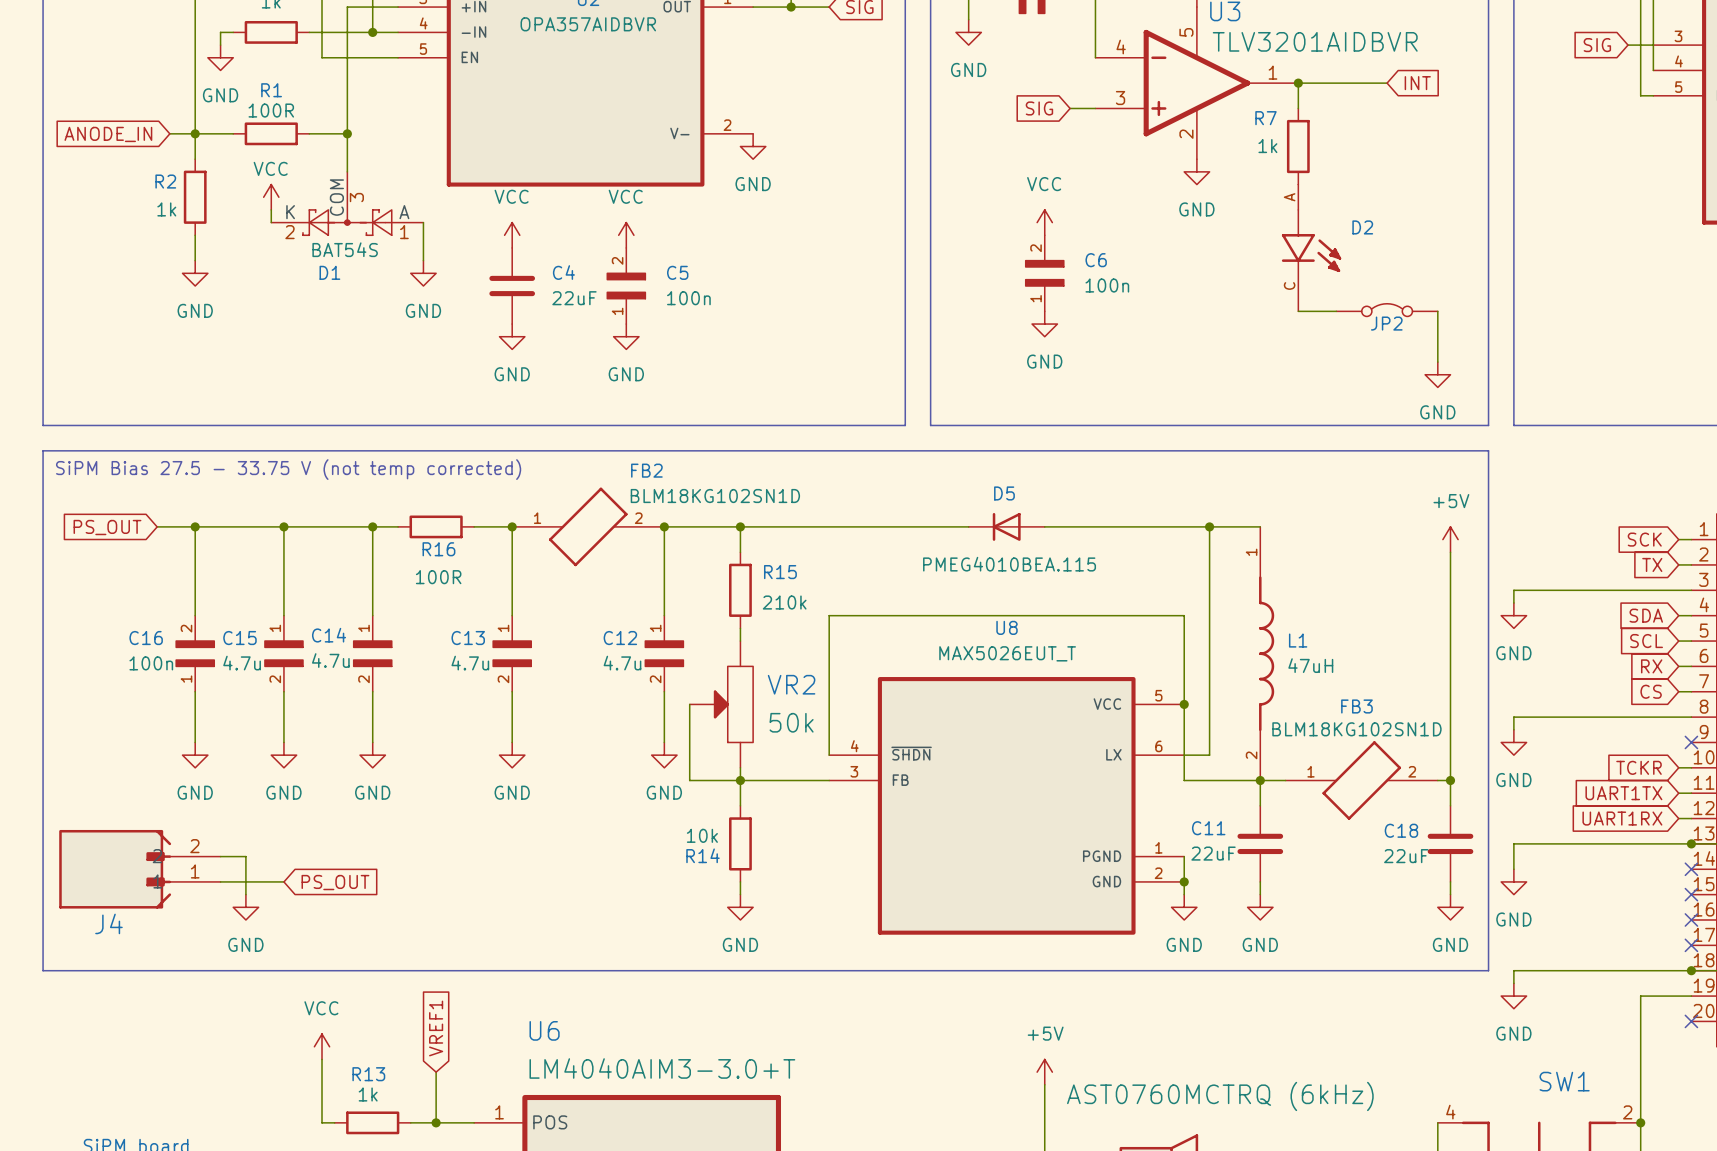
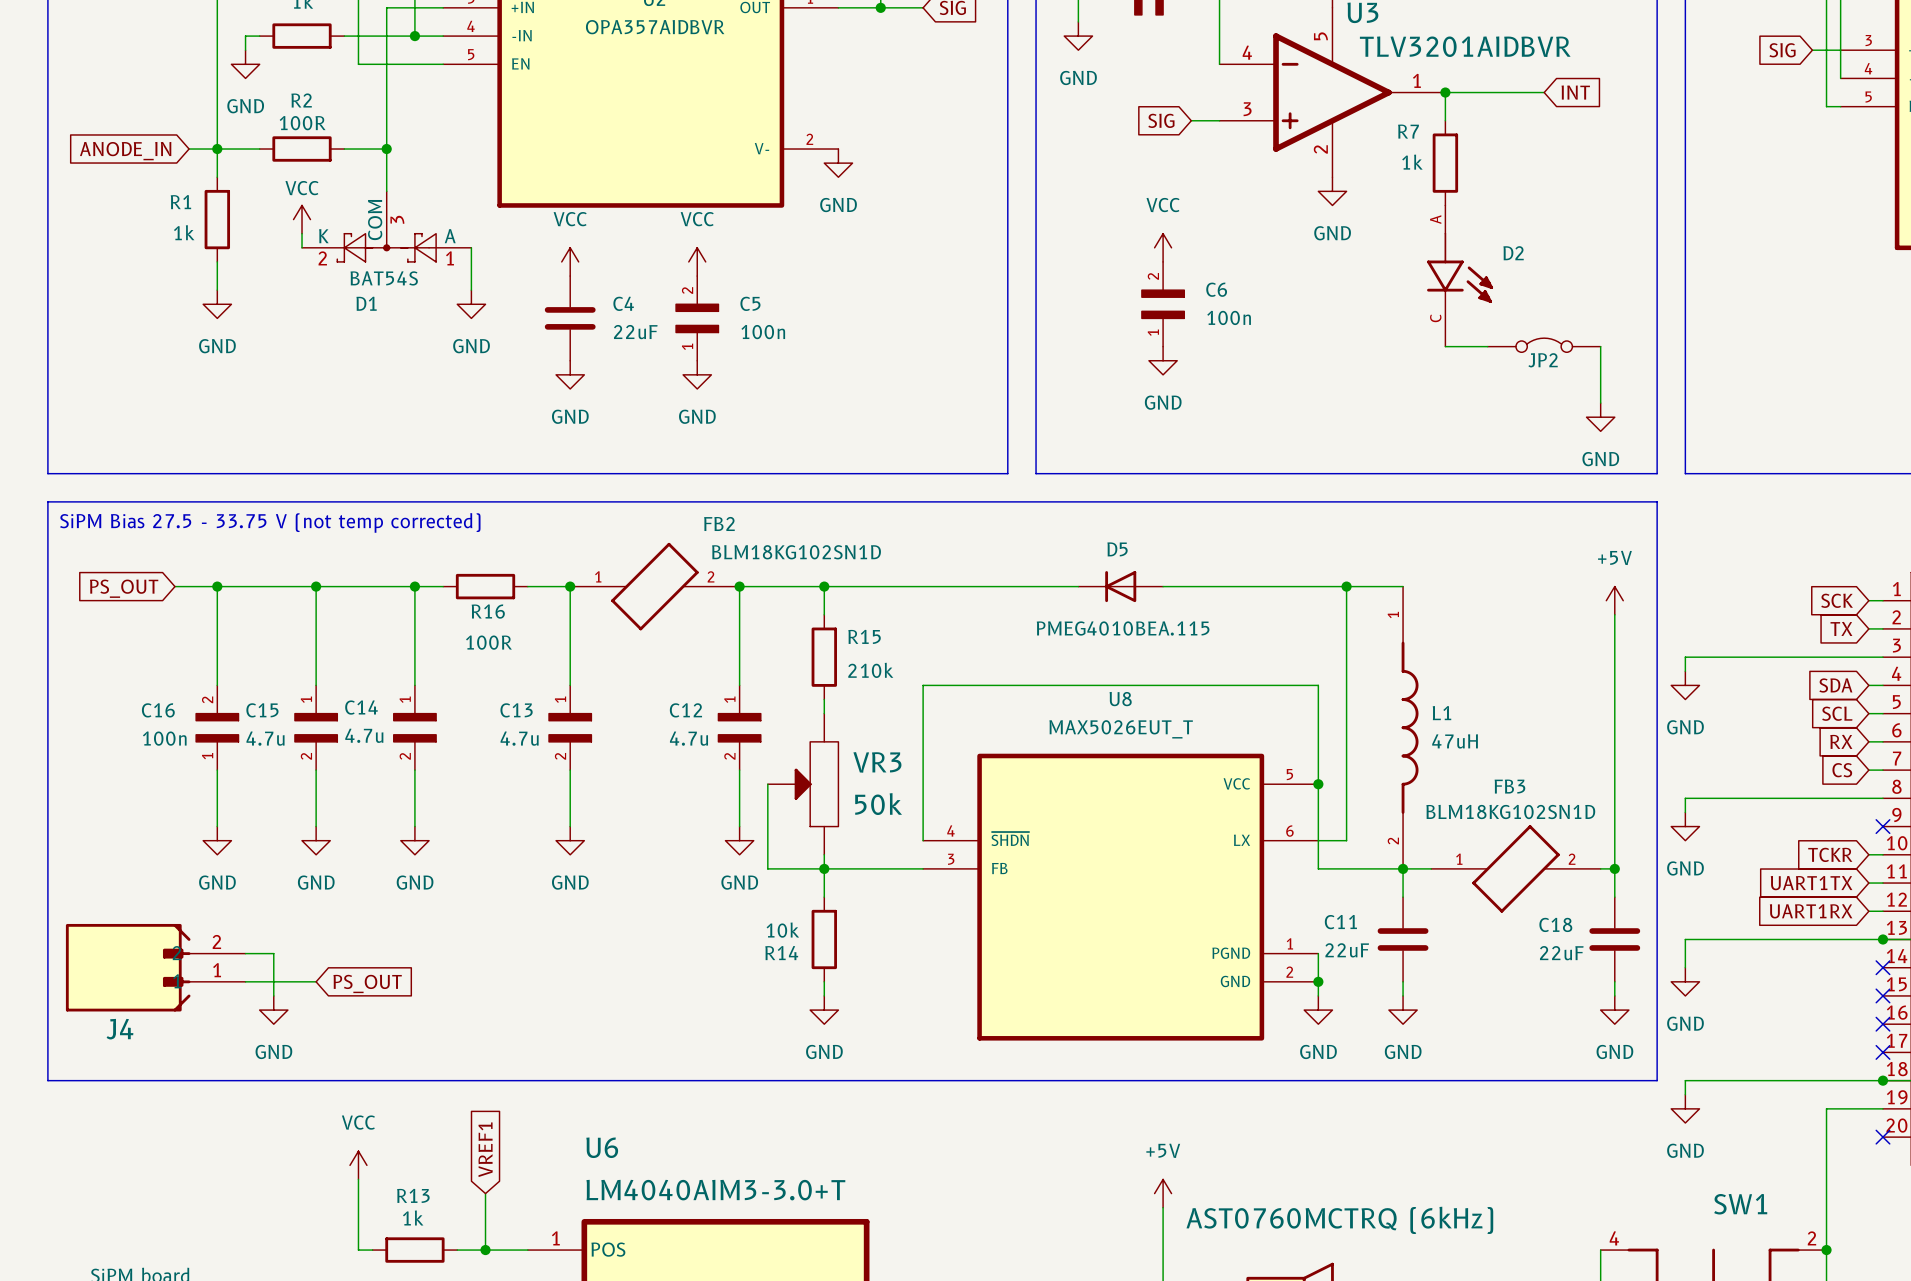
R1 name: R1 (271, 90) -> R2 (301, 100)
R2 name: R2 (165, 181) -> R1 (180, 202)
VR2 name: VR2 (791, 684) -> VR3 (877, 762)

